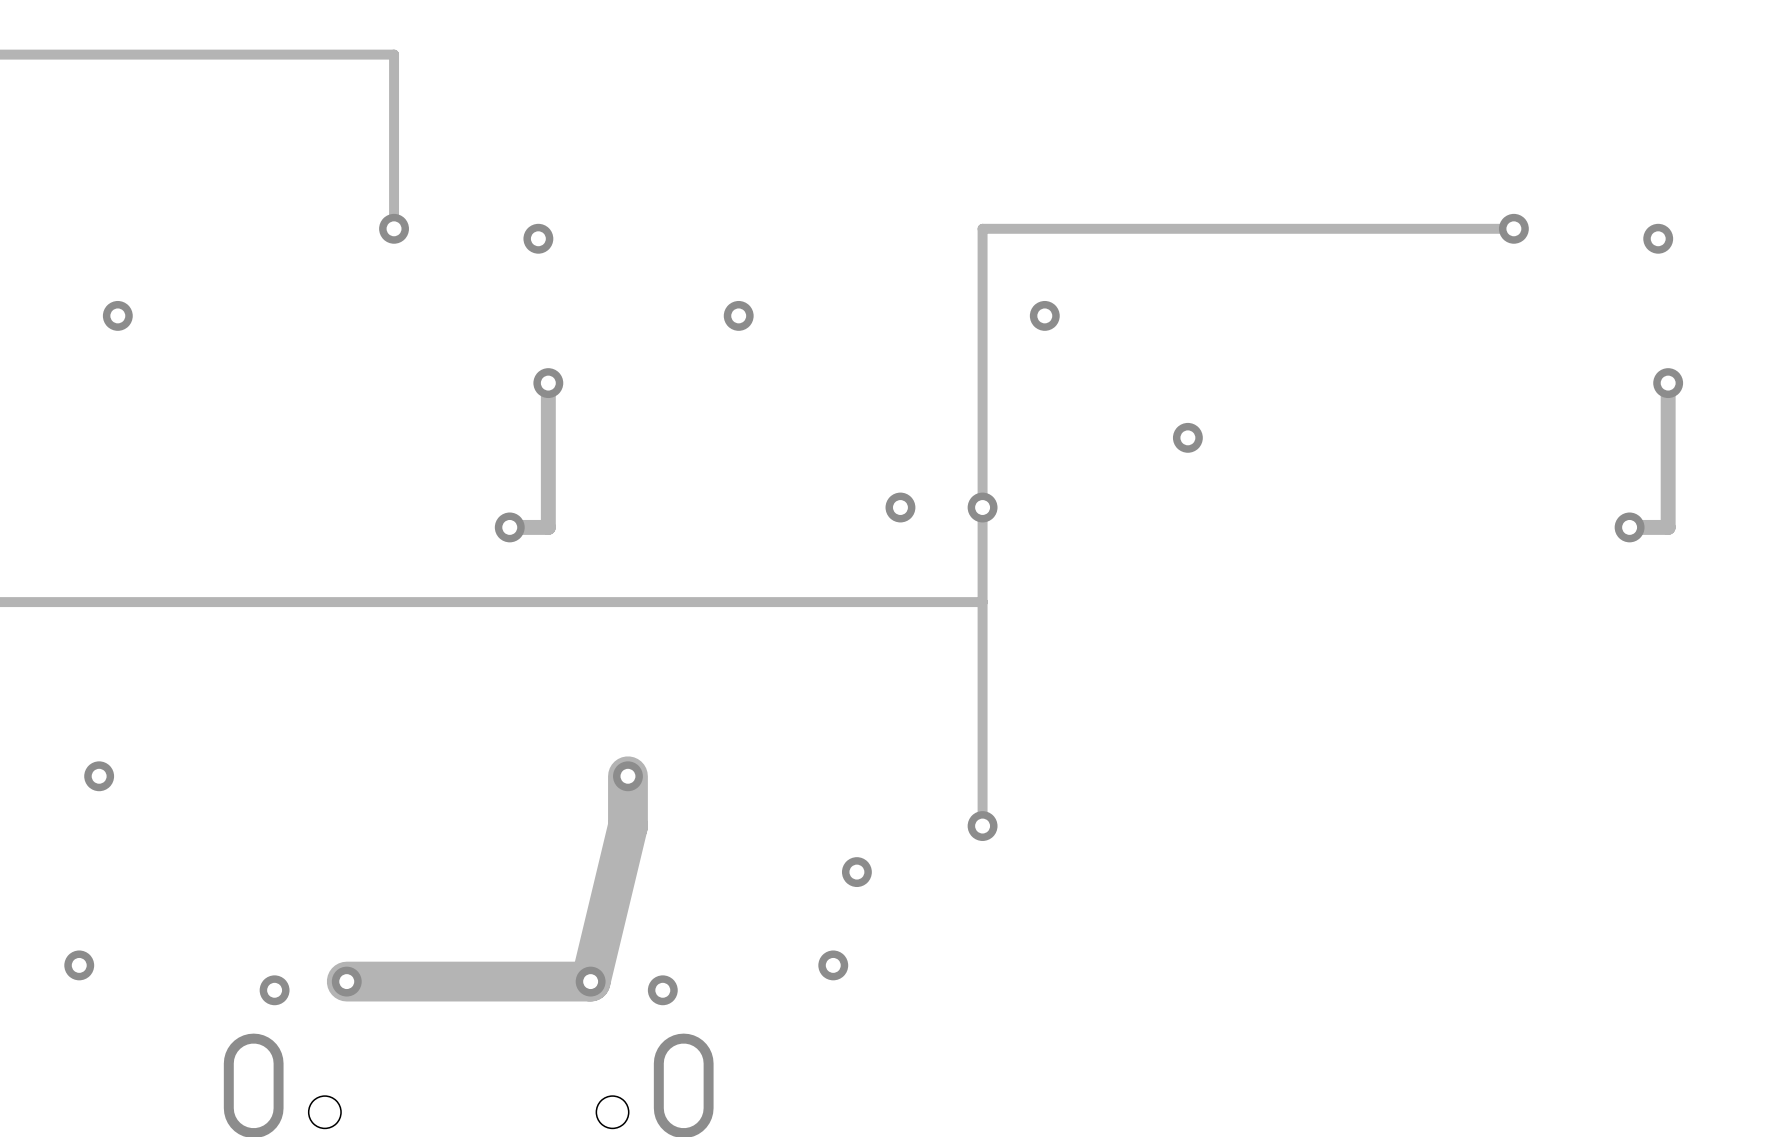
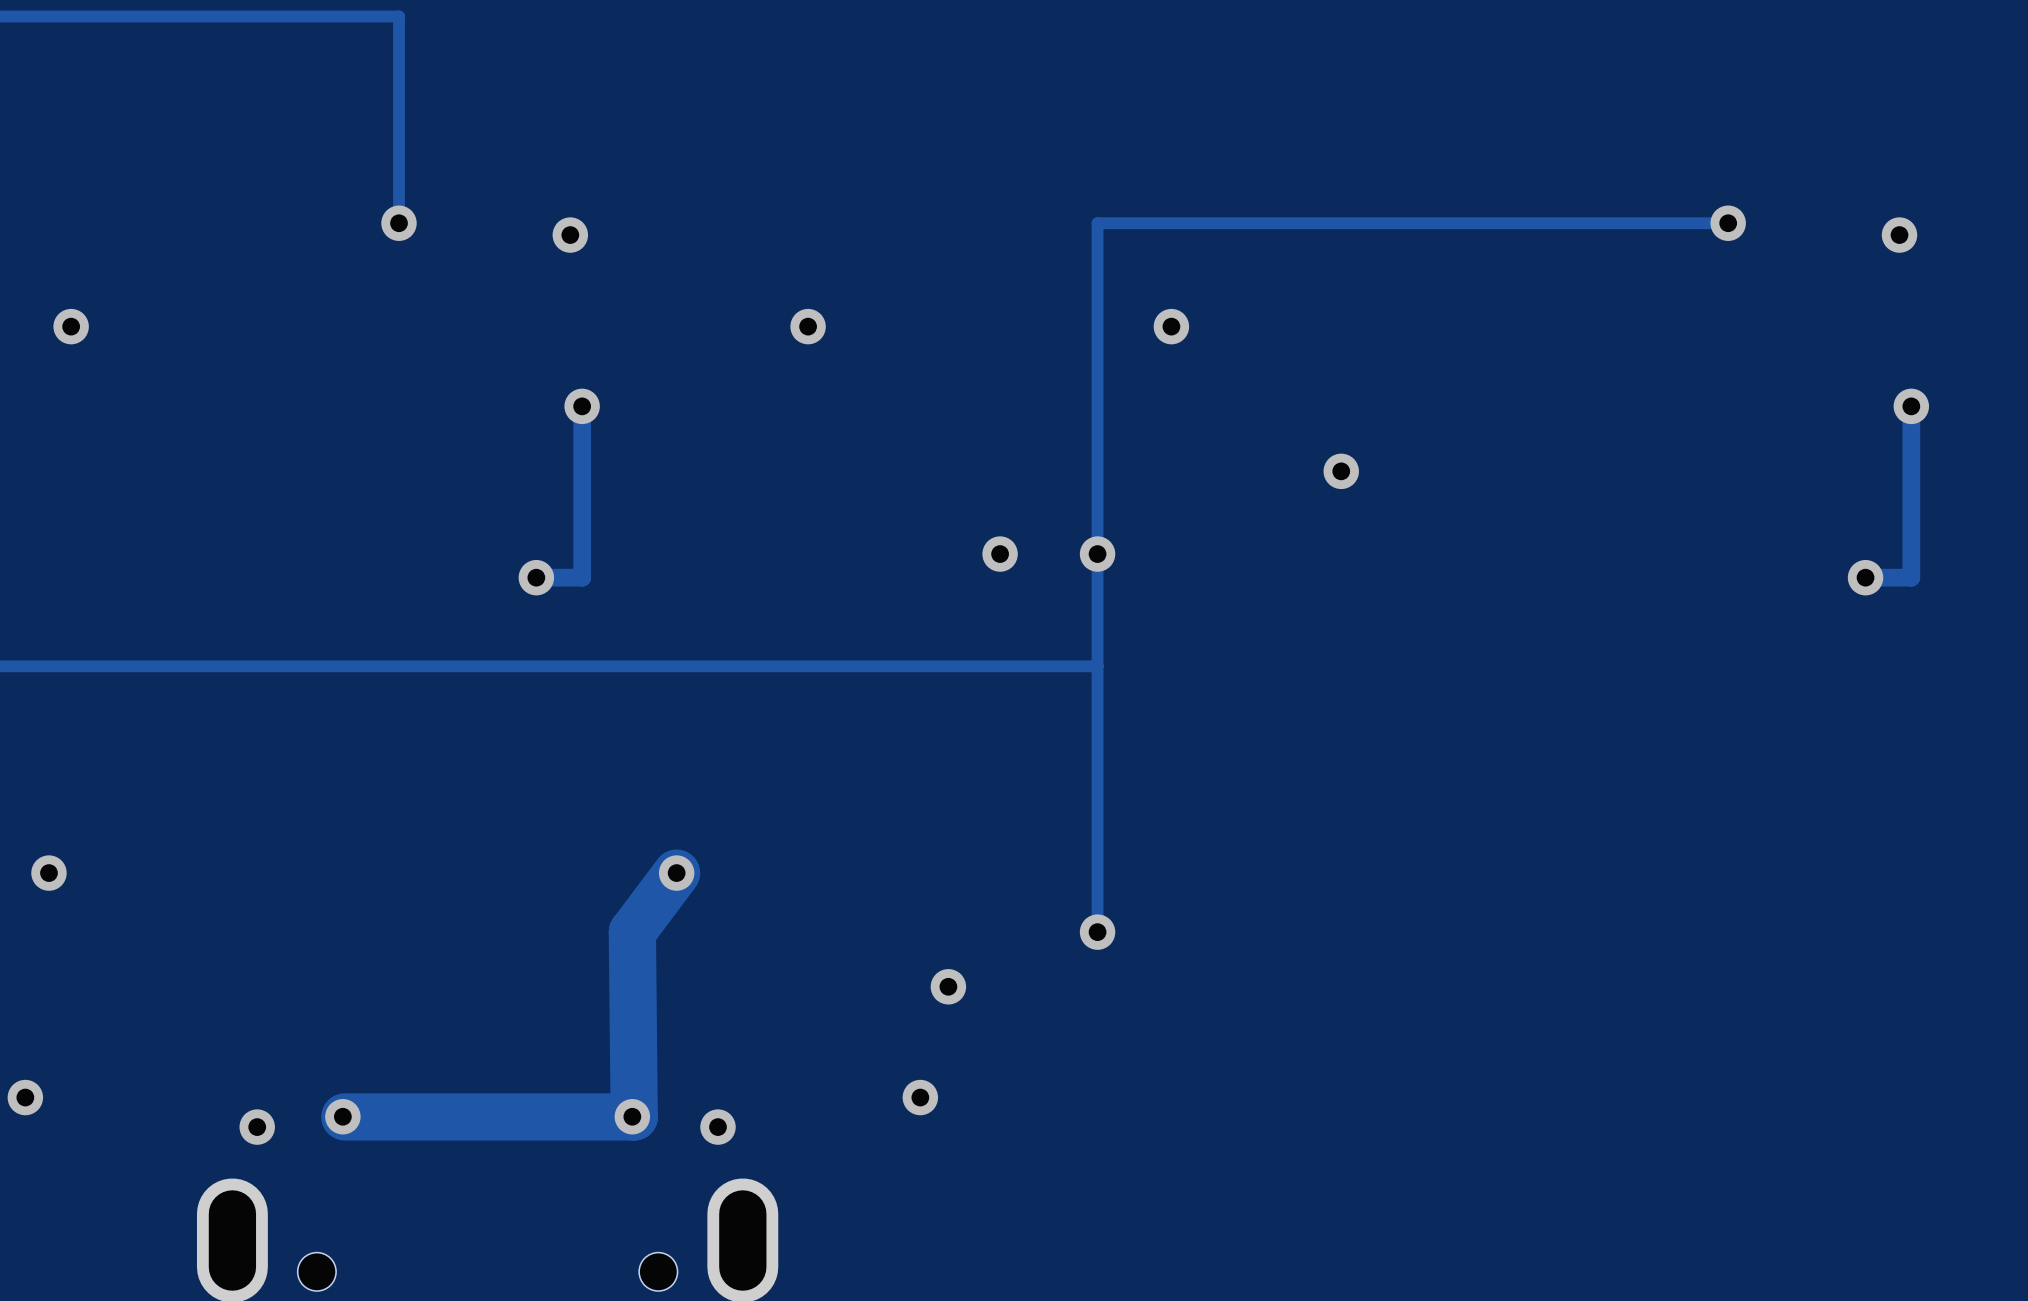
track: (627, 776) (627, 826) (590, 981) (346, 981) -> (676, 873) (632, 932) (634, 1116) (344, 1116)

